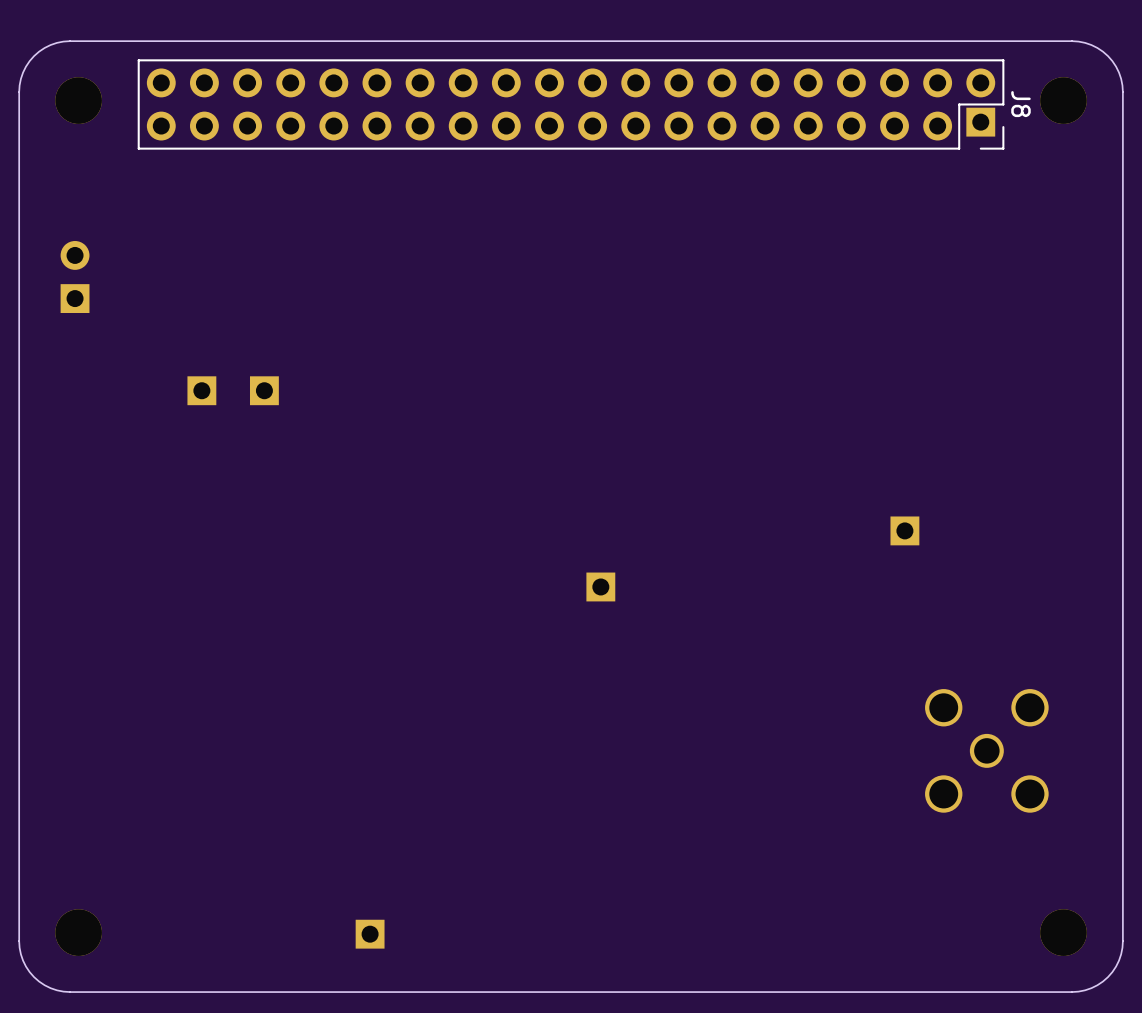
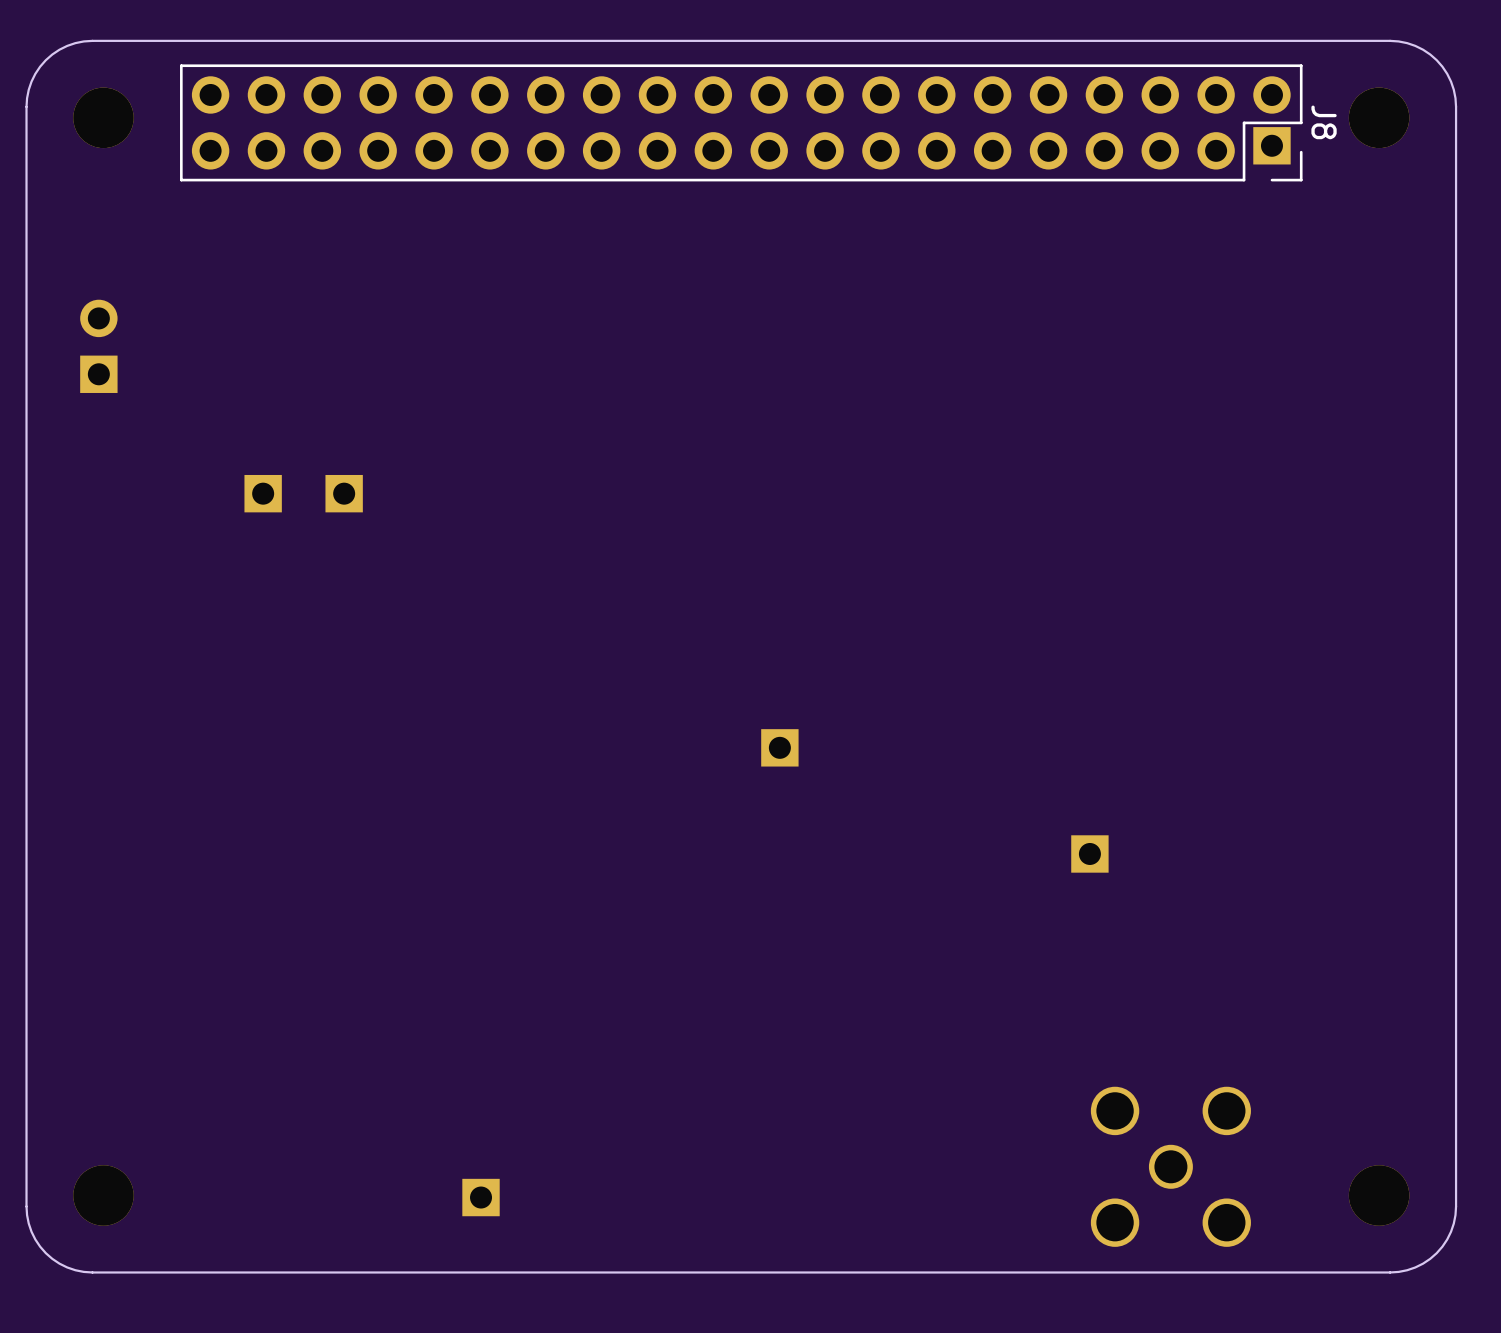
part position: (904, 530) -> (1089, 853)
part position: (986, 750) -> (1170, 1166)

